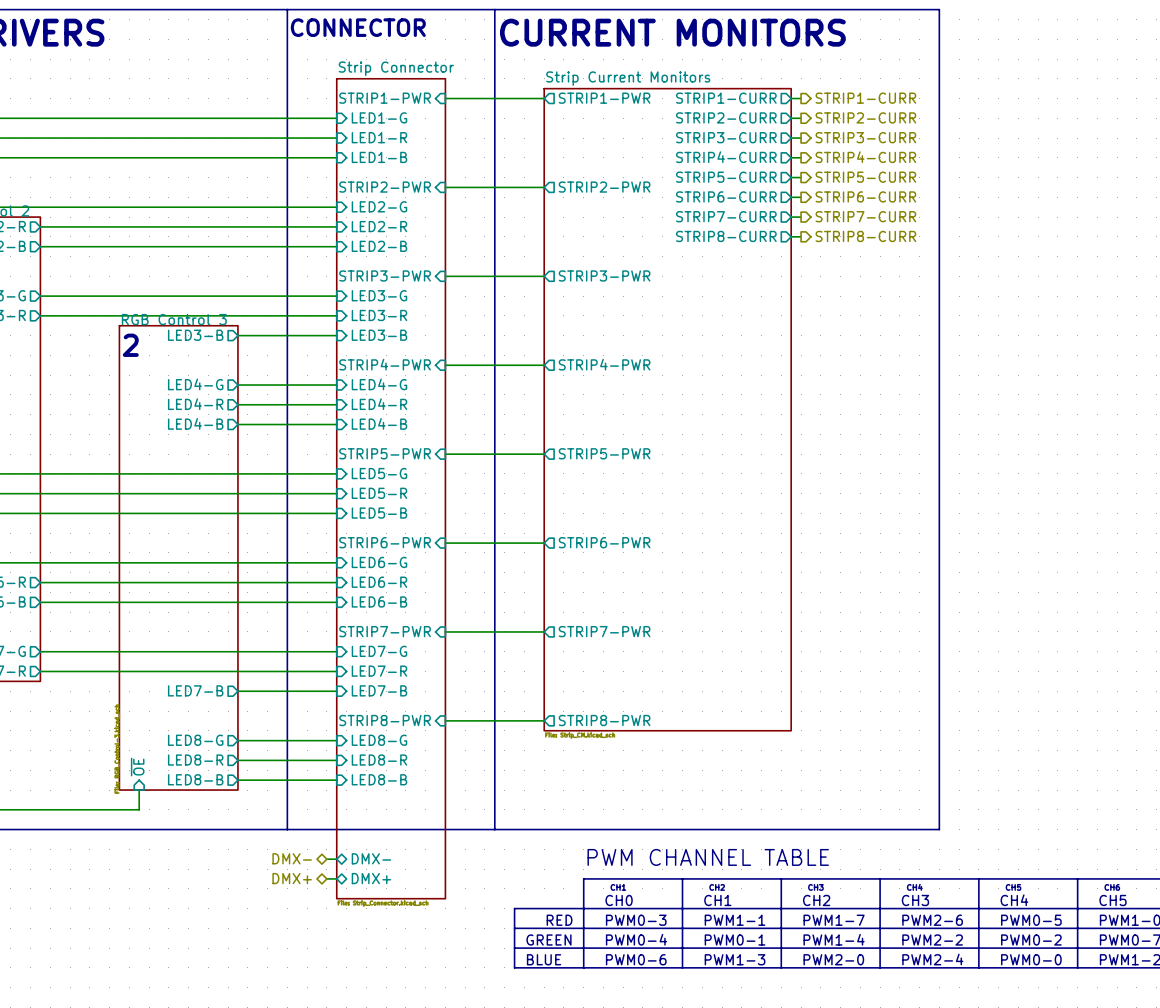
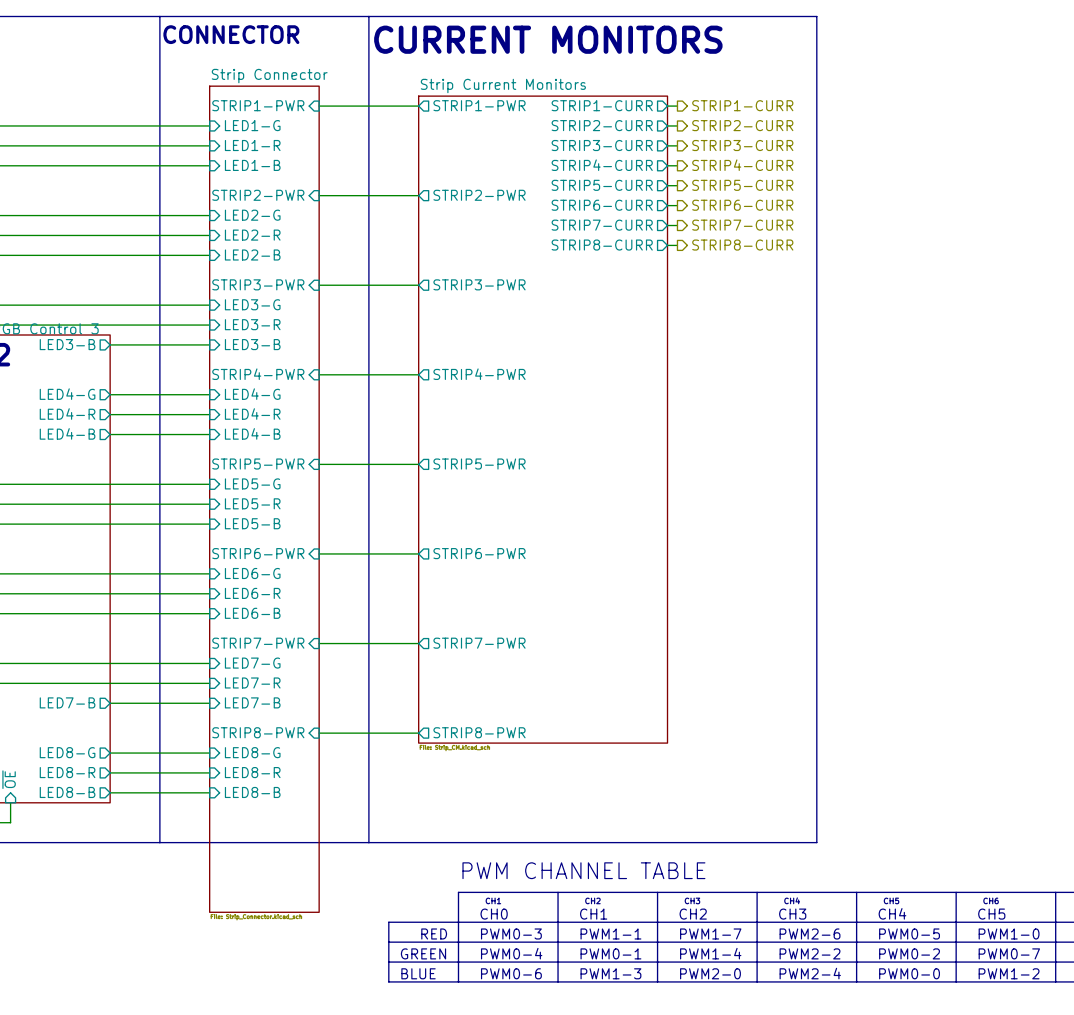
hierarchical label: DMX- (292, 858) -> none
sheet pin: DMX- (371, 858) -> none
wire: (326, 859) (336, 859) -> none
hierarchical label: DMX+ (292, 878) -> none
wire: (326, 878) (336, 878) -> none
sheet pin: DMX+ (371, 878) -> none

